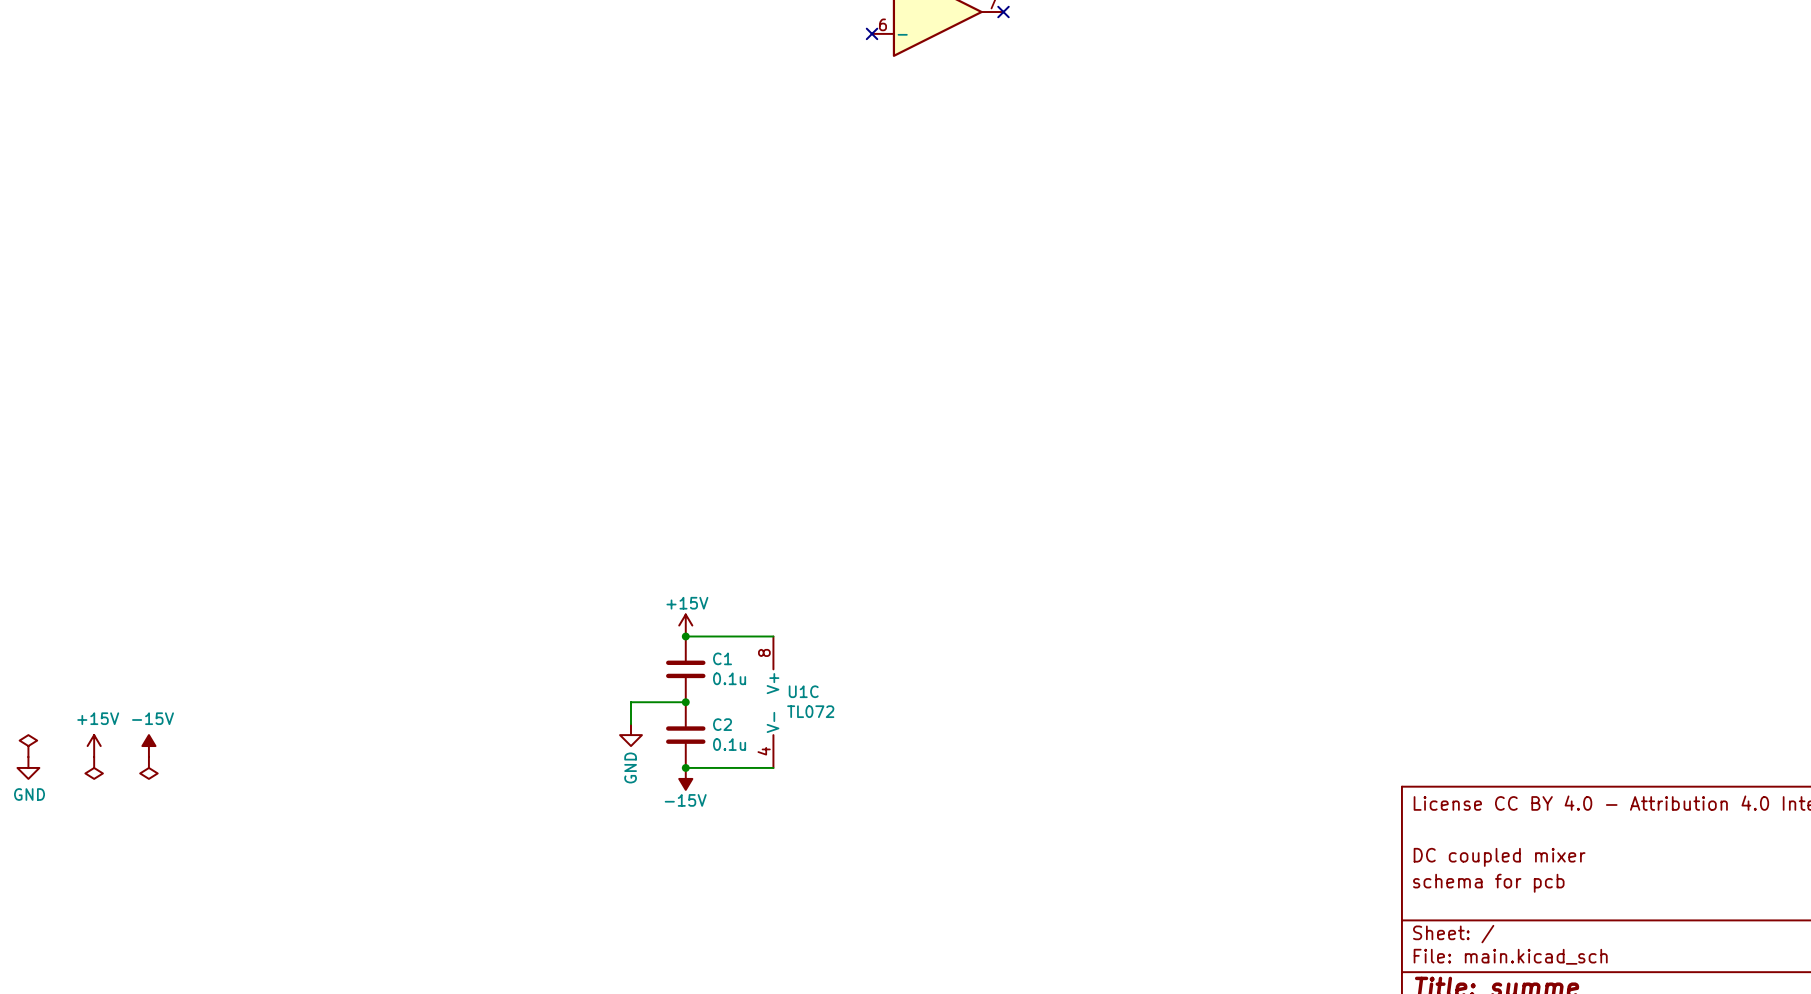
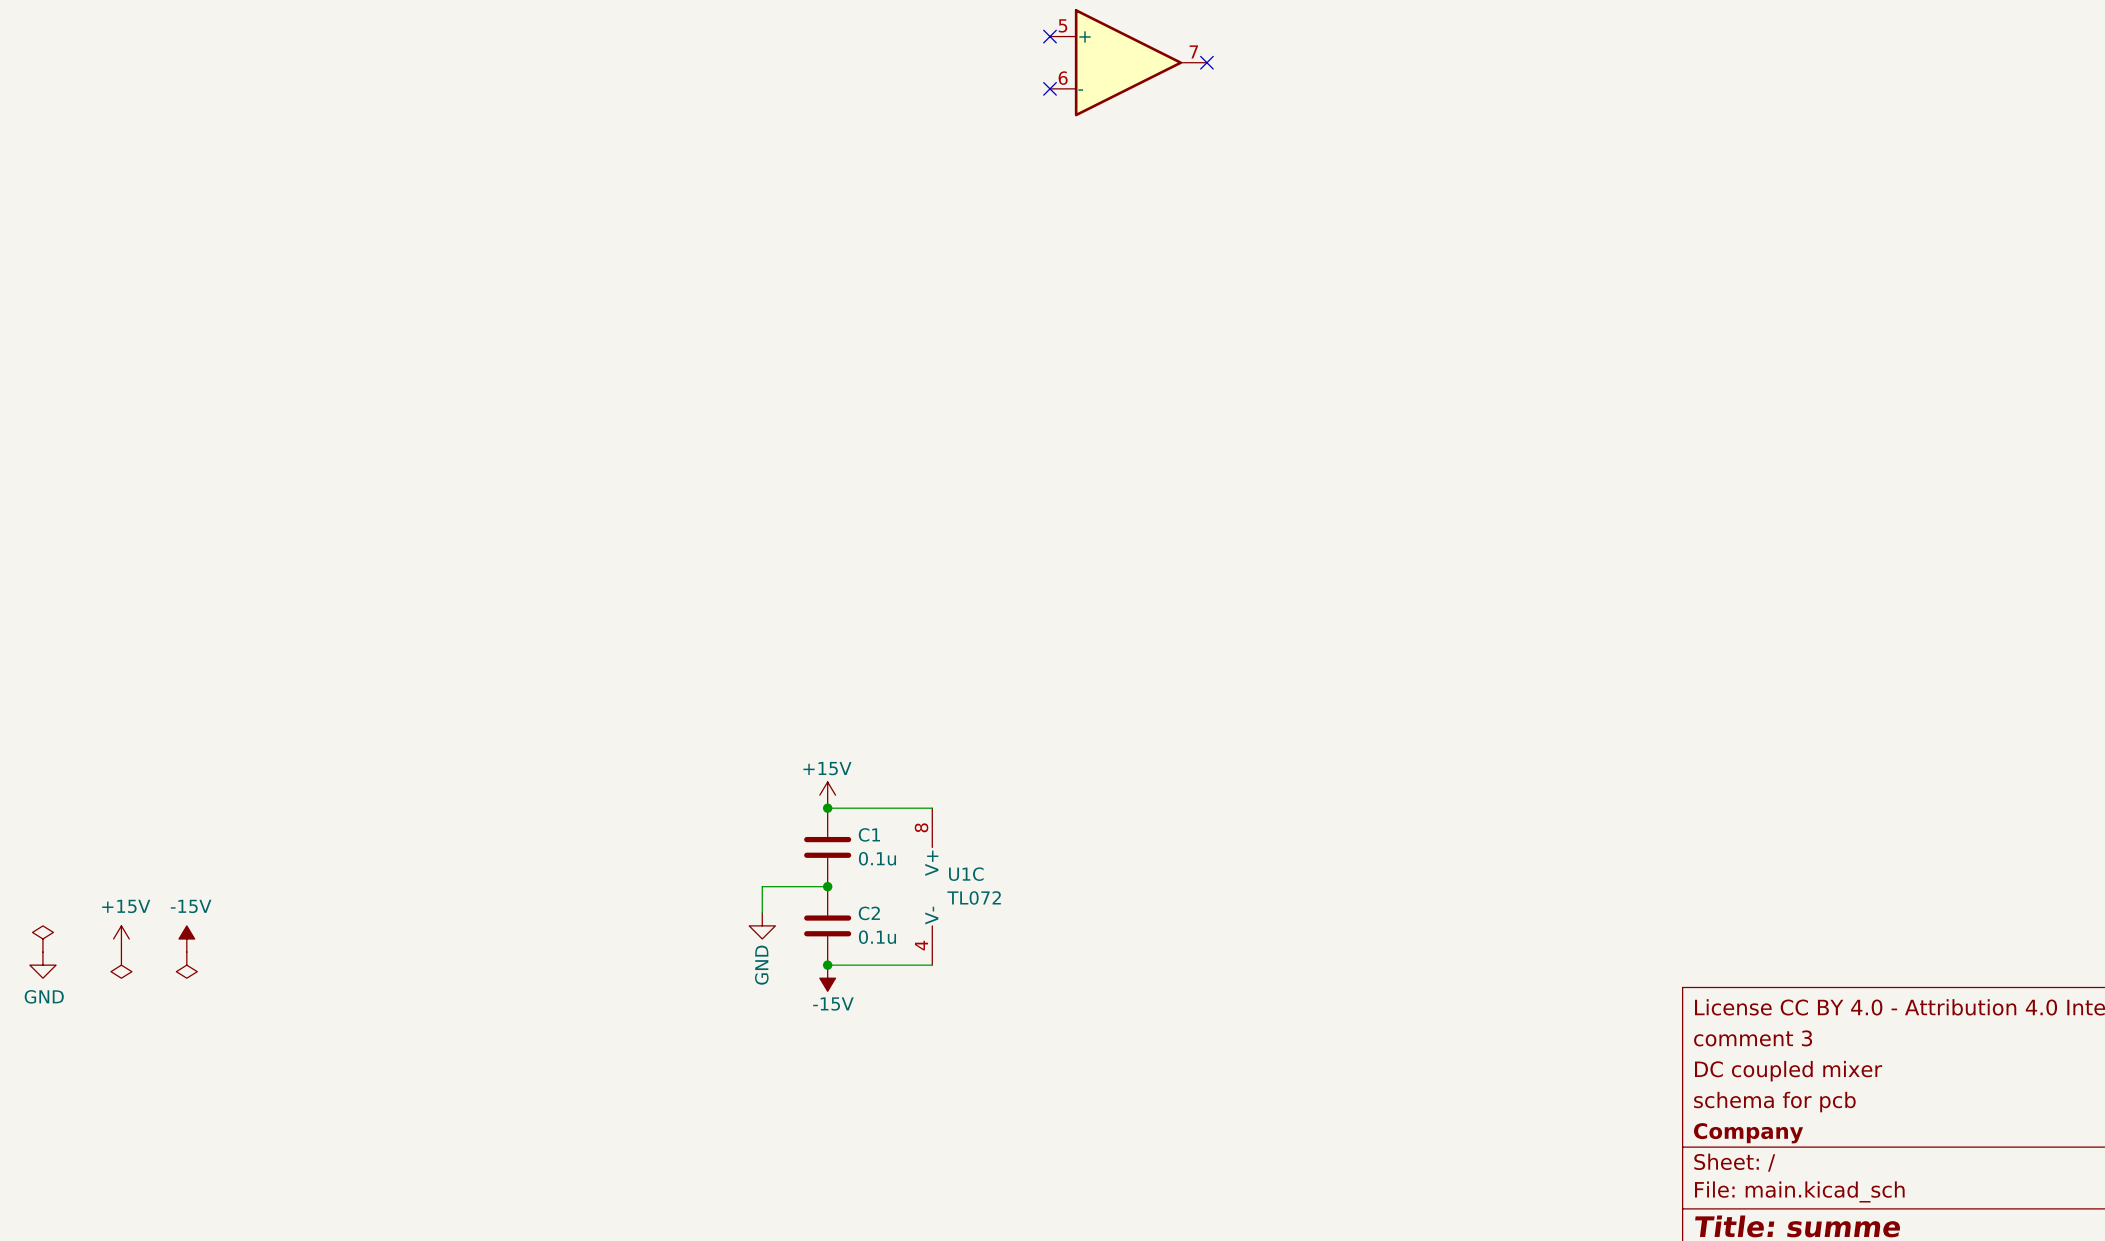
title block: none -> comment 3 (1753, 1038)
title block: none -> Company (1748, 1133)

